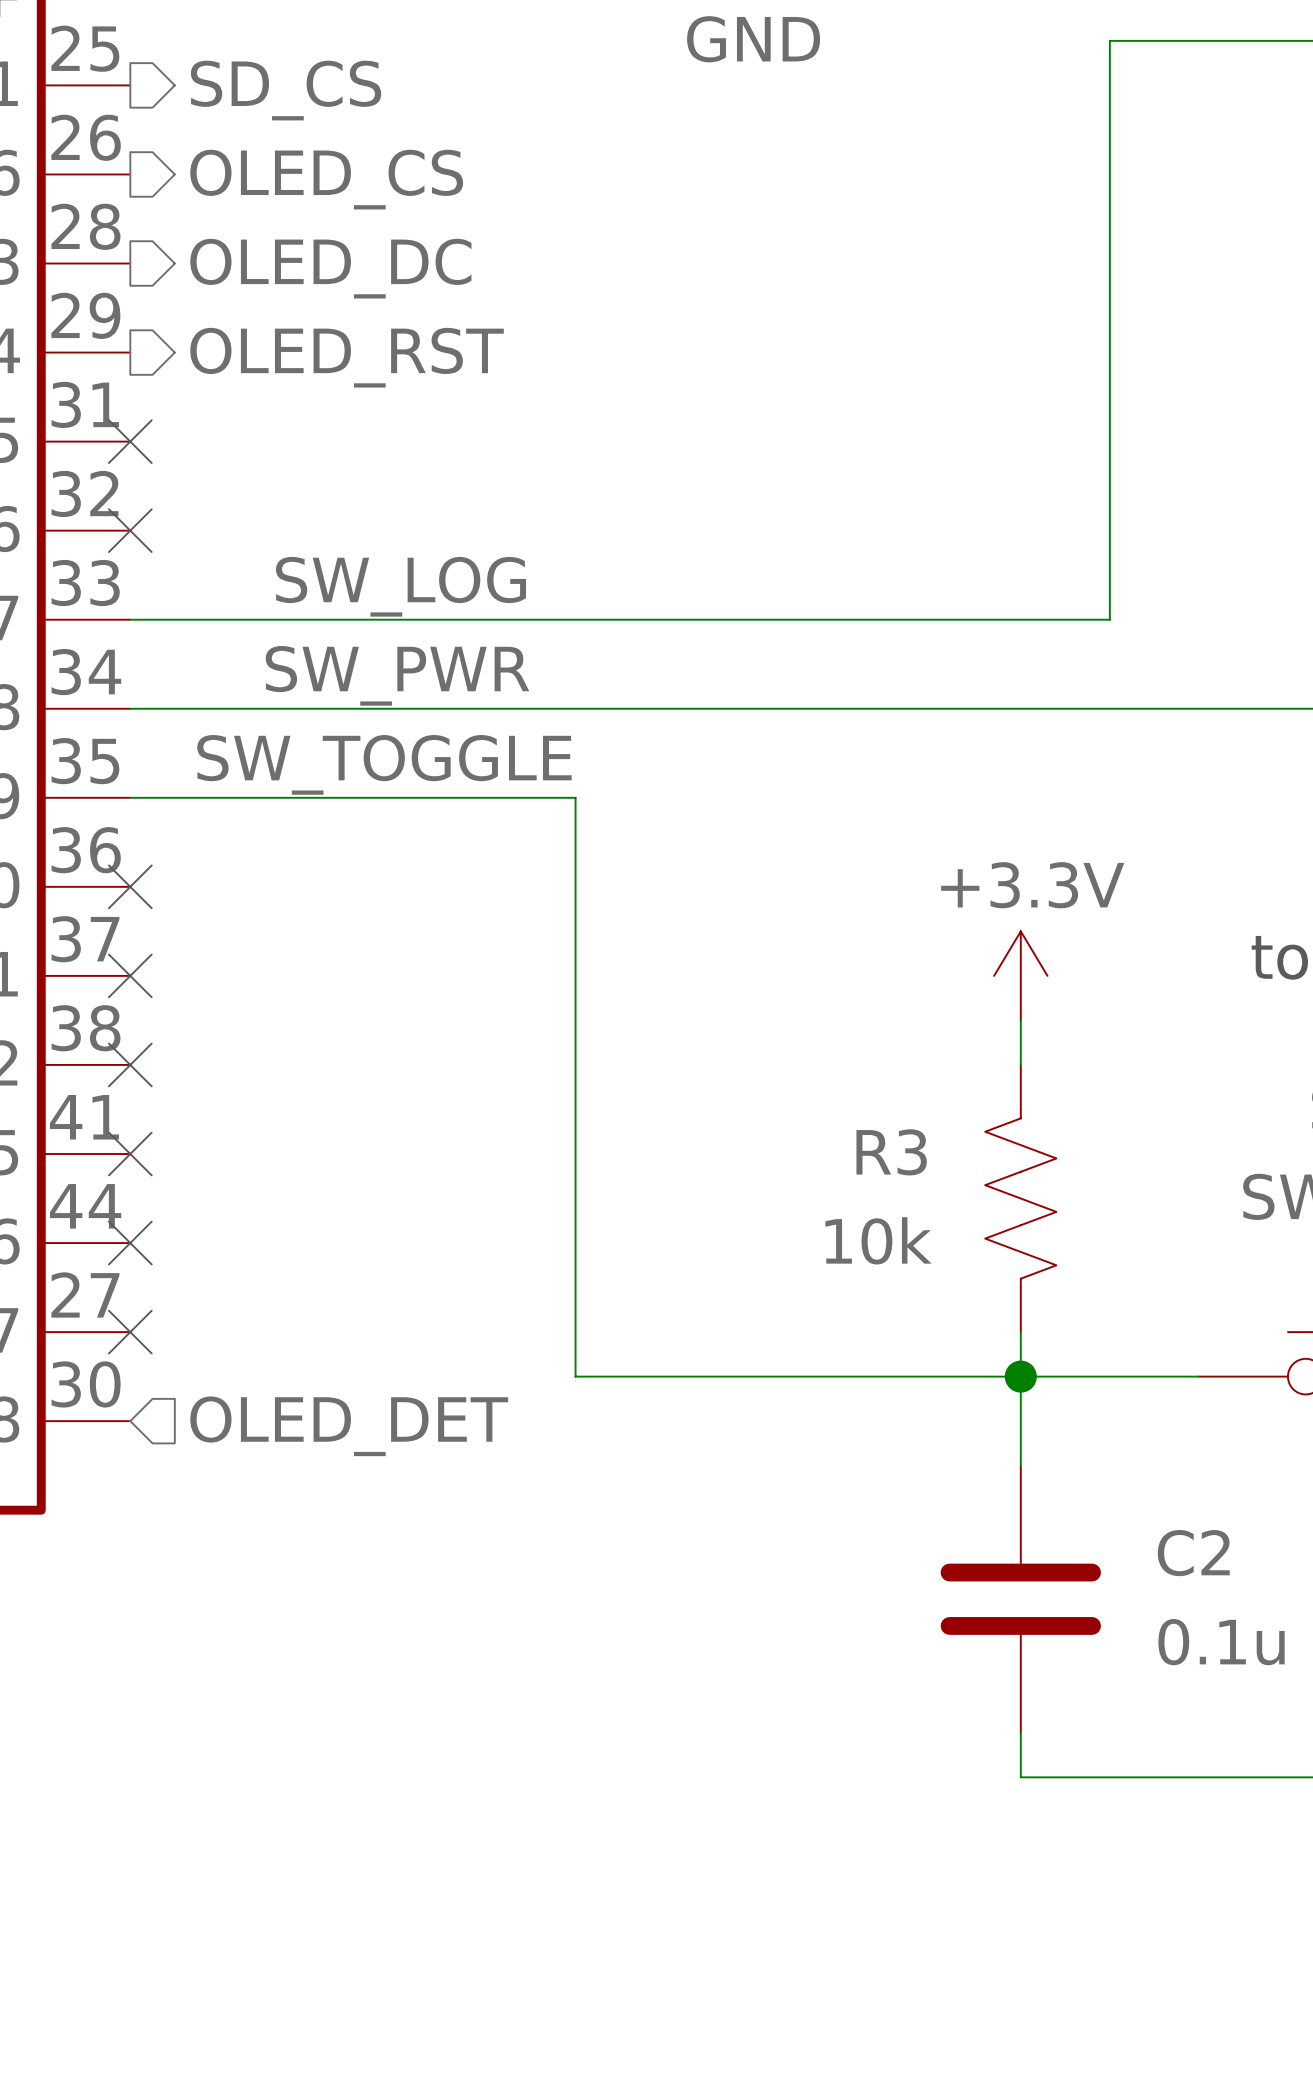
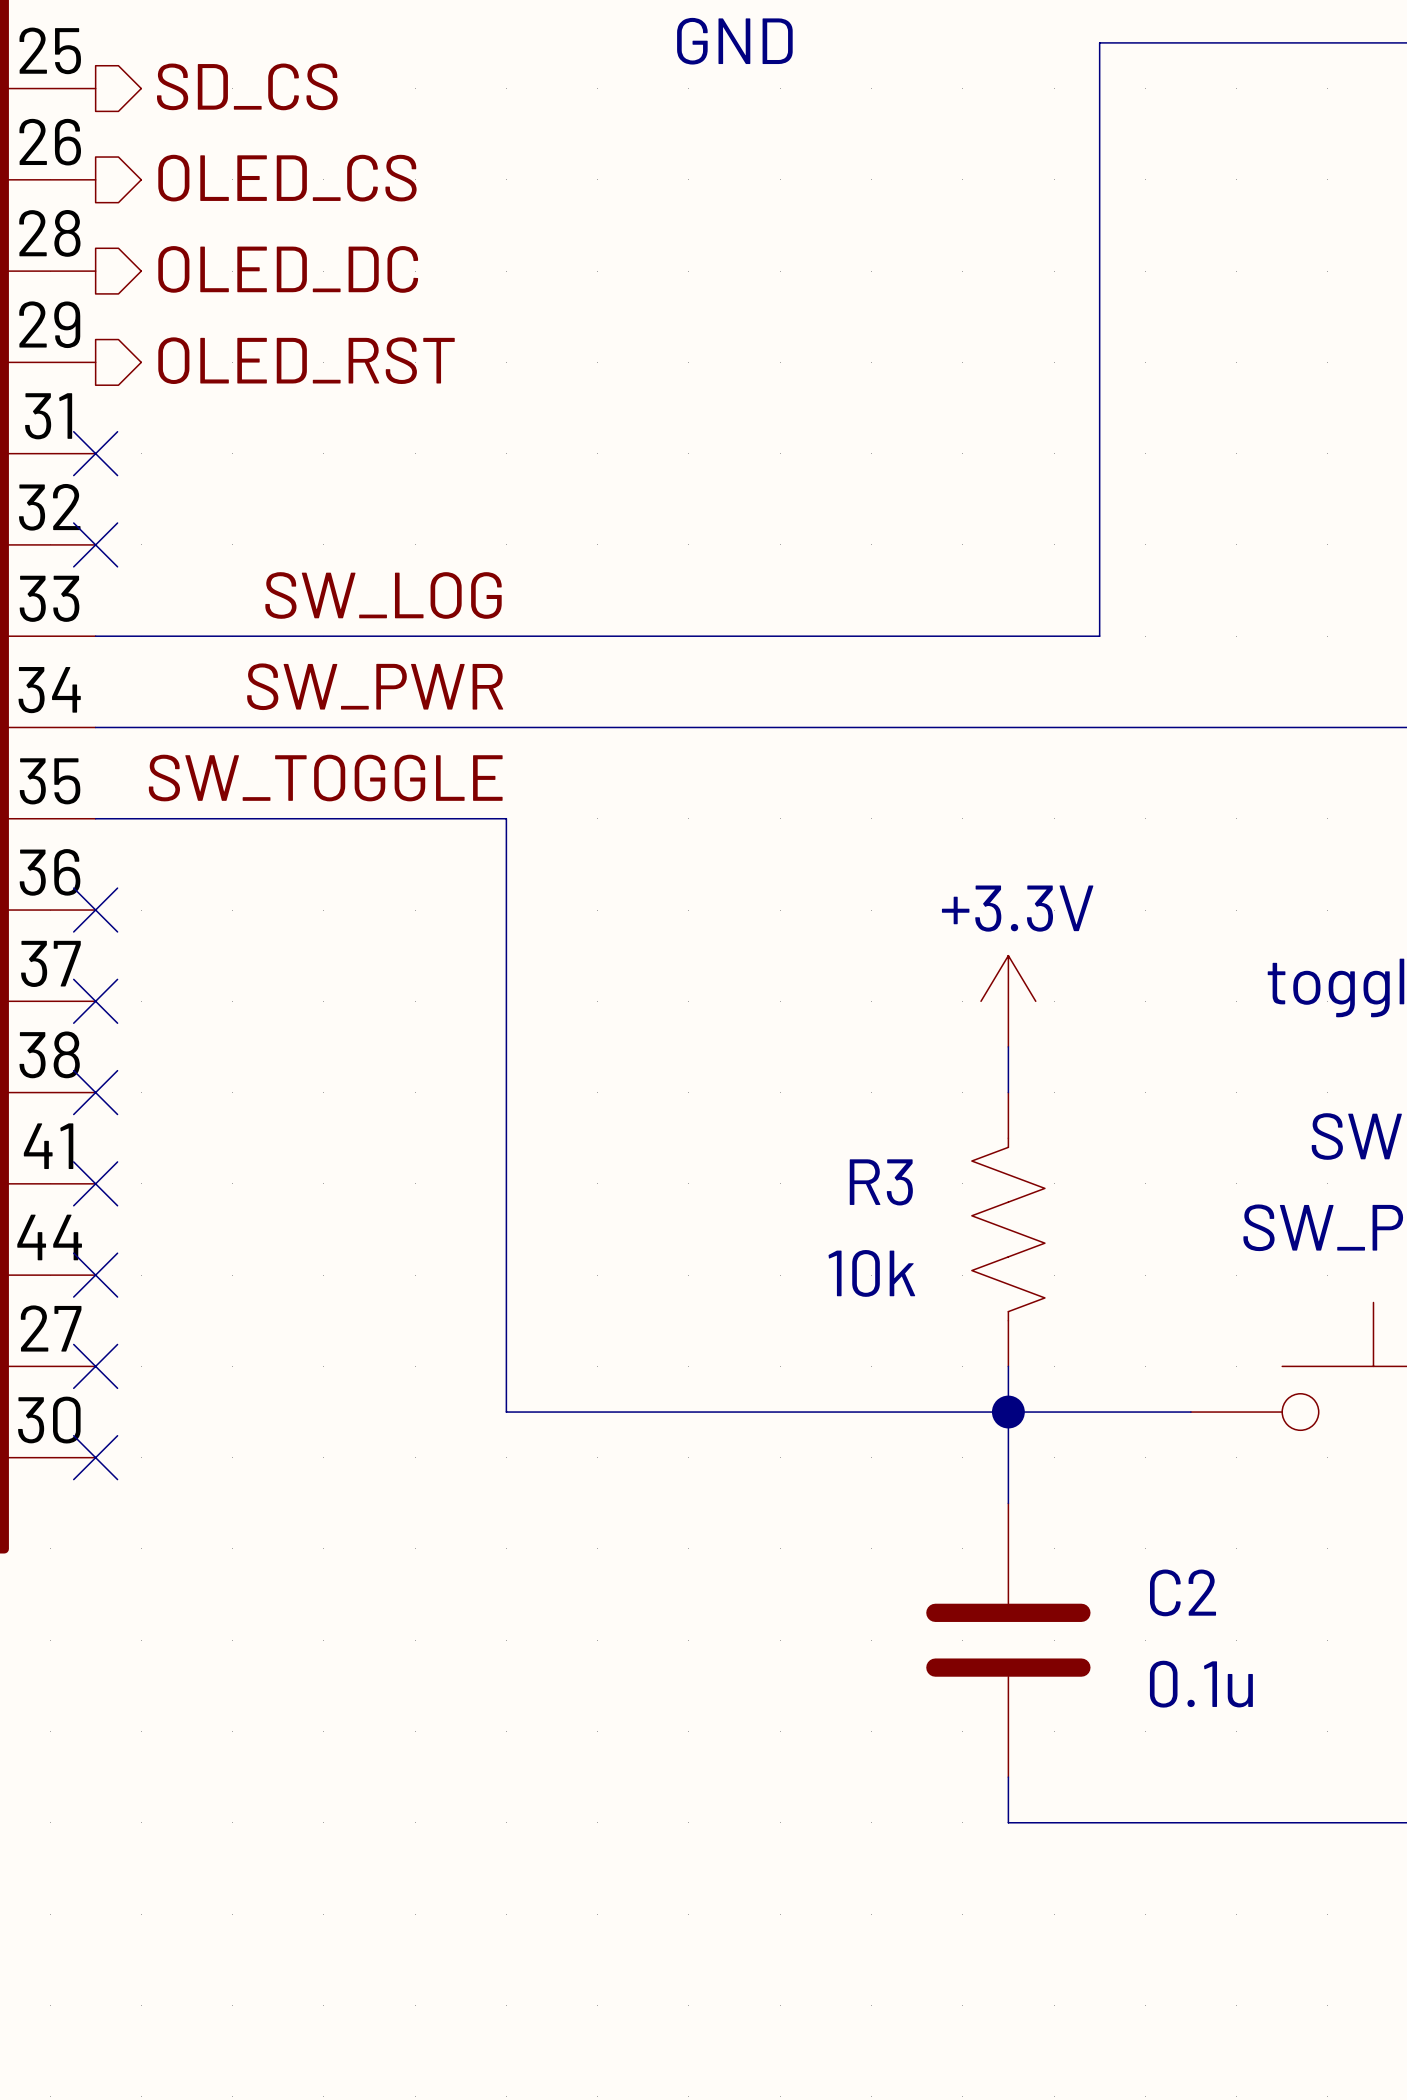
label position: SW_TOGGLE (384, 764) -> SW_TOGGLE (325, 778)
wire: (531, 797) (575, 797) (575, 1376) -> (506, 818) (506, 1412) (552, 1412)
no-connect mark: none -> (95, 1457)
hierarchical label: OLED_DET (349, 1426) -> none

